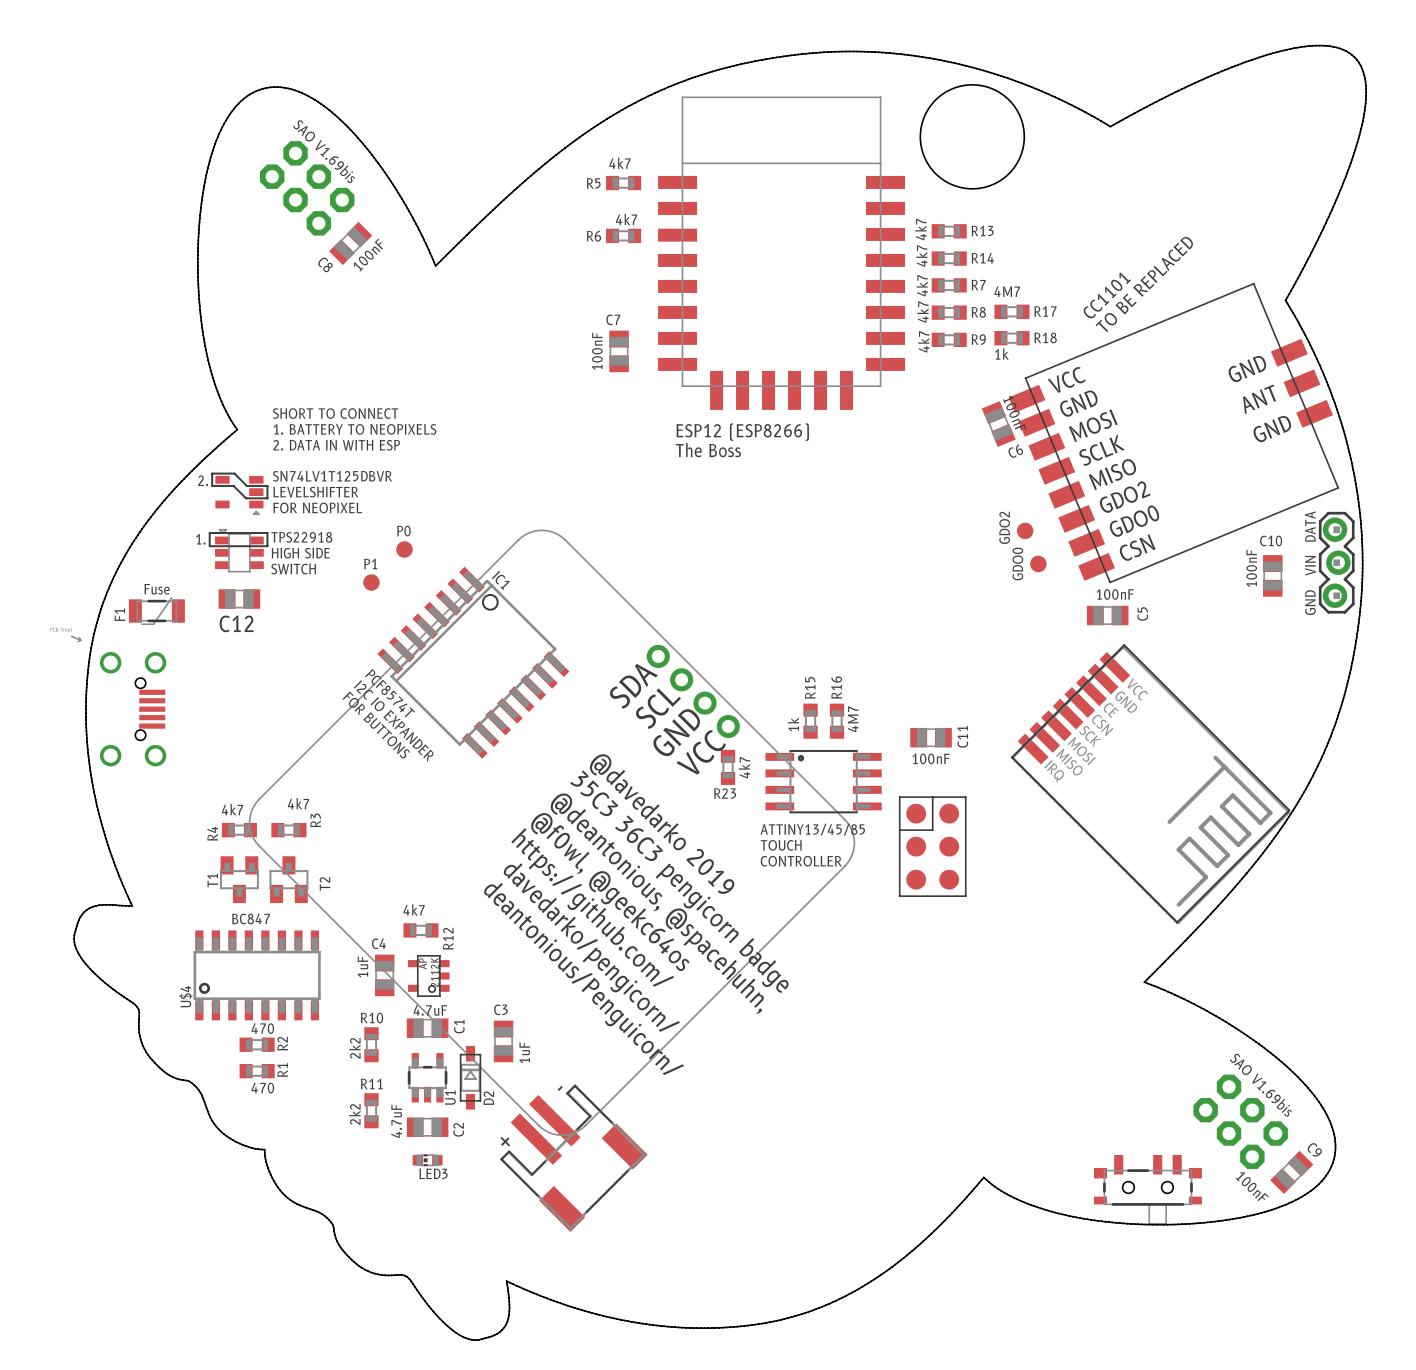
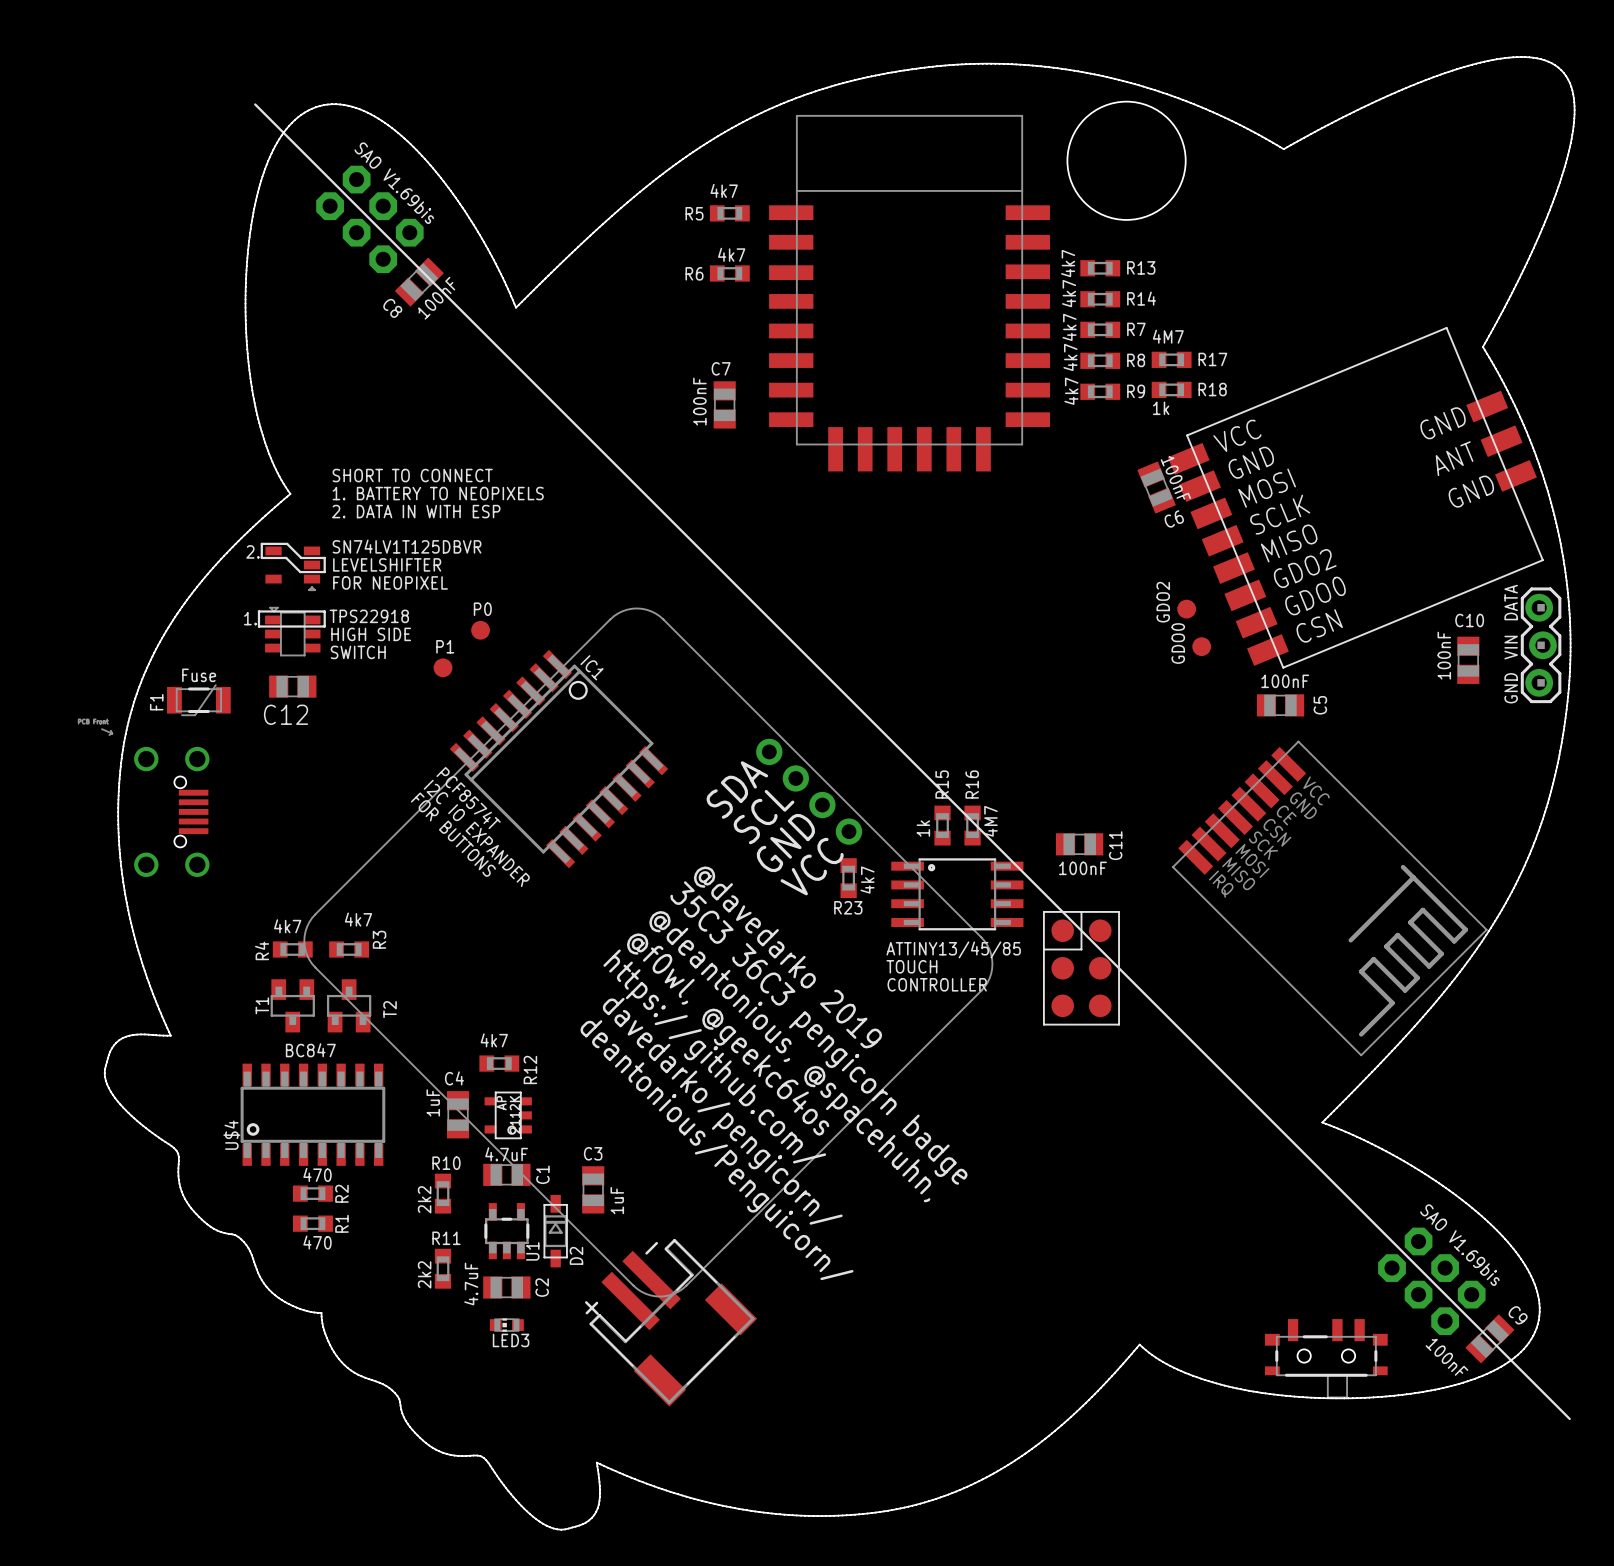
line: none -> (255, 104) (1569, 1418)
text: TO BE REPLACED (1144, 284) -> none
text: CC1101 (1107, 295) -> none
text: ESP12 (ESP8266) (742, 432) -> none
text: The Boss (708, 450) -> none
line: (1124, 645) (1011, 757) (1177, 922) (1289, 810) (1124, 645) -> none

